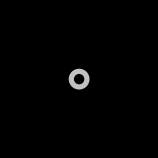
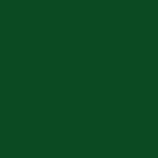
via: (79, 79) -> none

